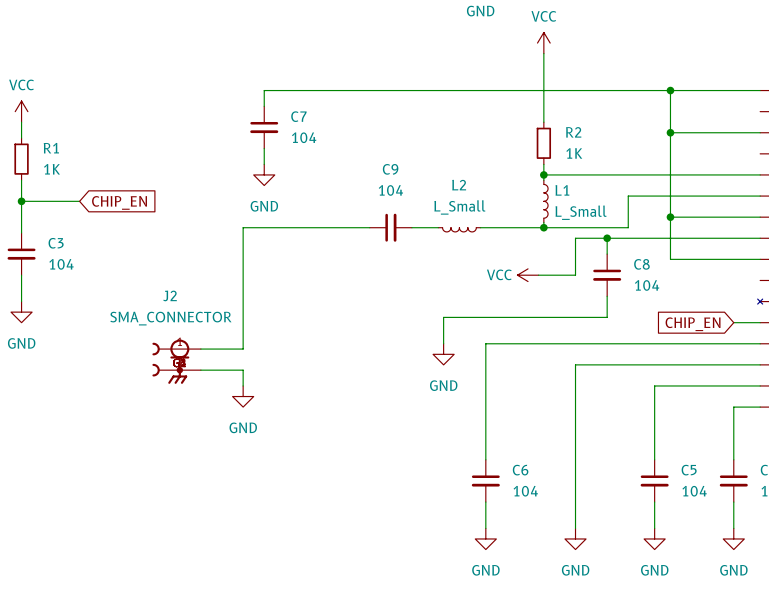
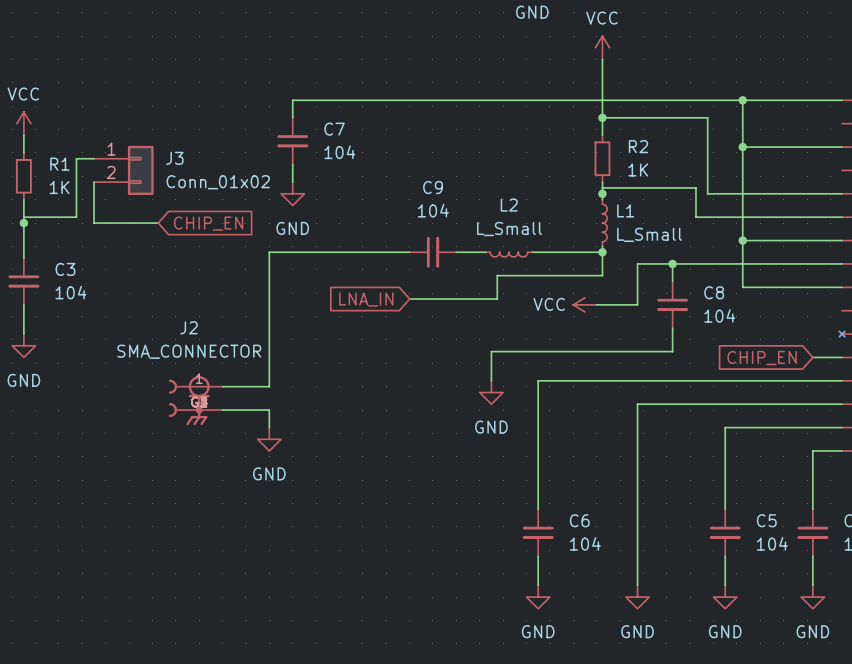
junction: none -> (602, 117)
wire: none -> (94, 158) (76, 158) (76, 217) (23, 217)
J3: none -> Conn_01x02 (123, 170)
wire: none -> (94, 182) (94, 223) (158, 223)
wire: (543, 174) (638, 174) -> (602, 117) (707, 117) (707, 193)
wire: (628, 196) (628, 227) (543, 227) -> (695, 217) (695, 187) (602, 187)
wire: (21, 201) (79, 201) -> none
global label position: CHIP_EN (119, 202) -> CHIP_EN (208, 223)
wire: none -> (602, 252) (602, 275) (497, 275) (497, 299) (409, 299)
global label: none -> LNA_IN (366, 299)

